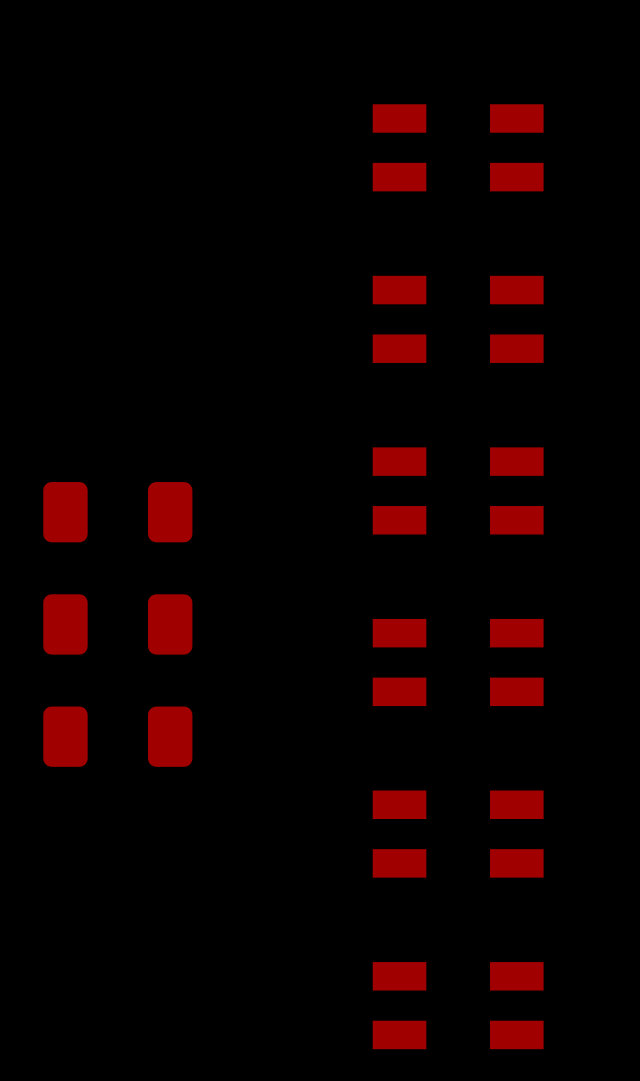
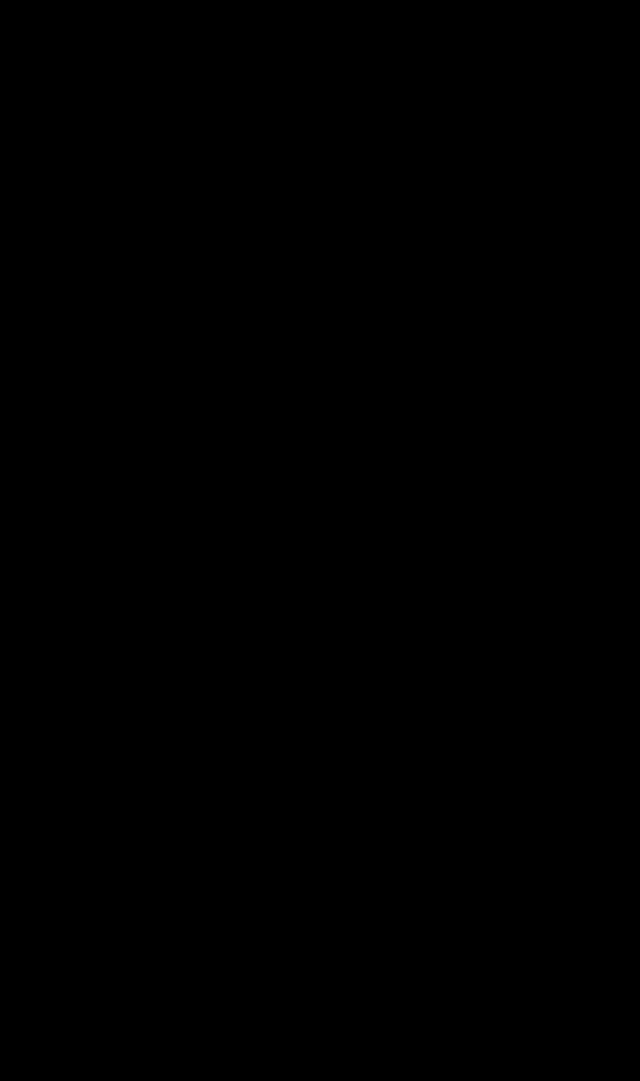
part: (458, 147) -> none
part: (458, 319) -> none
part: (458, 490) -> none
part: (117, 512) -> none
part: (117, 624) -> none
part: (458, 662) -> none
part: (117, 736) -> none
part: (458, 834) -> none
part: (458, 1005) -> none

